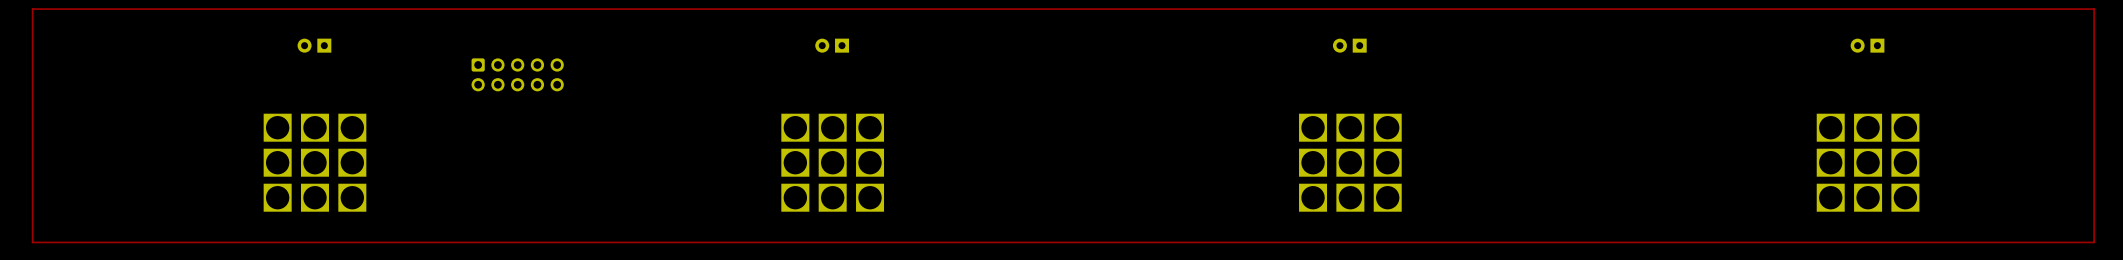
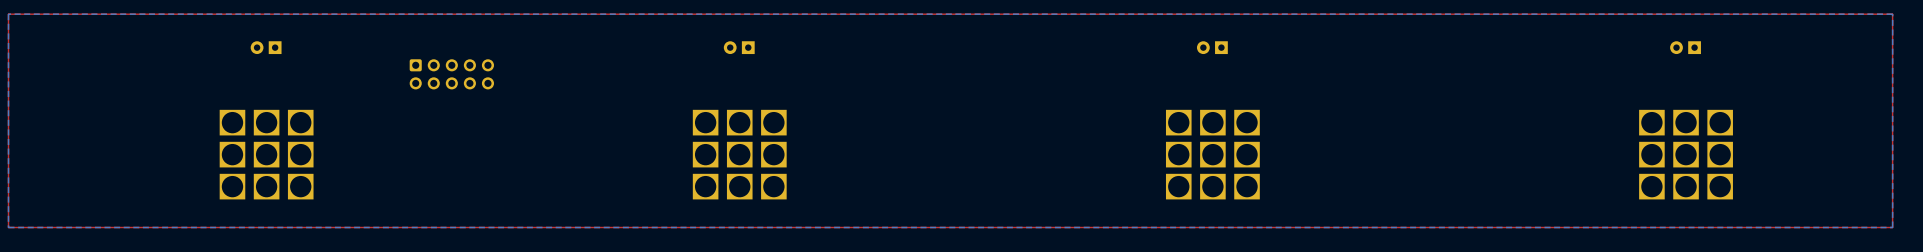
bottom zone outline: none -> (1892, 14) (8, 14) (8, 227) (1892, 227) (1892, 14)

